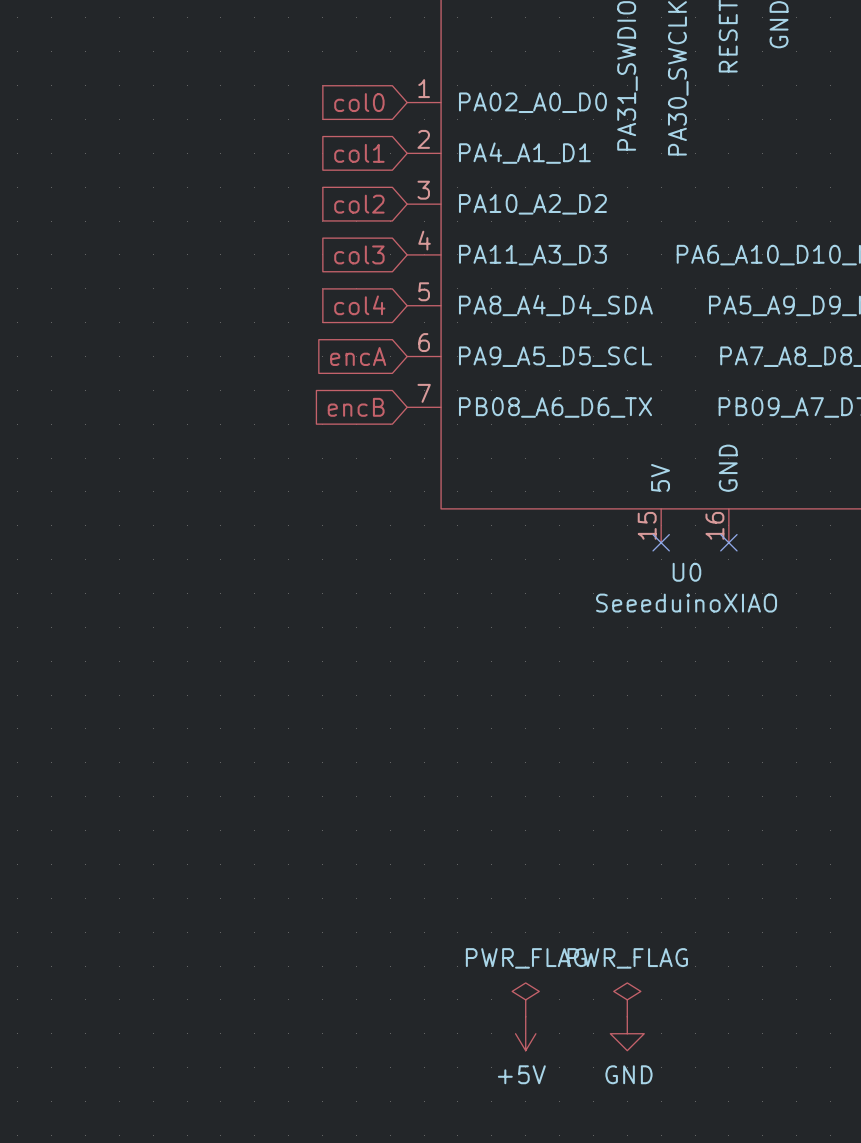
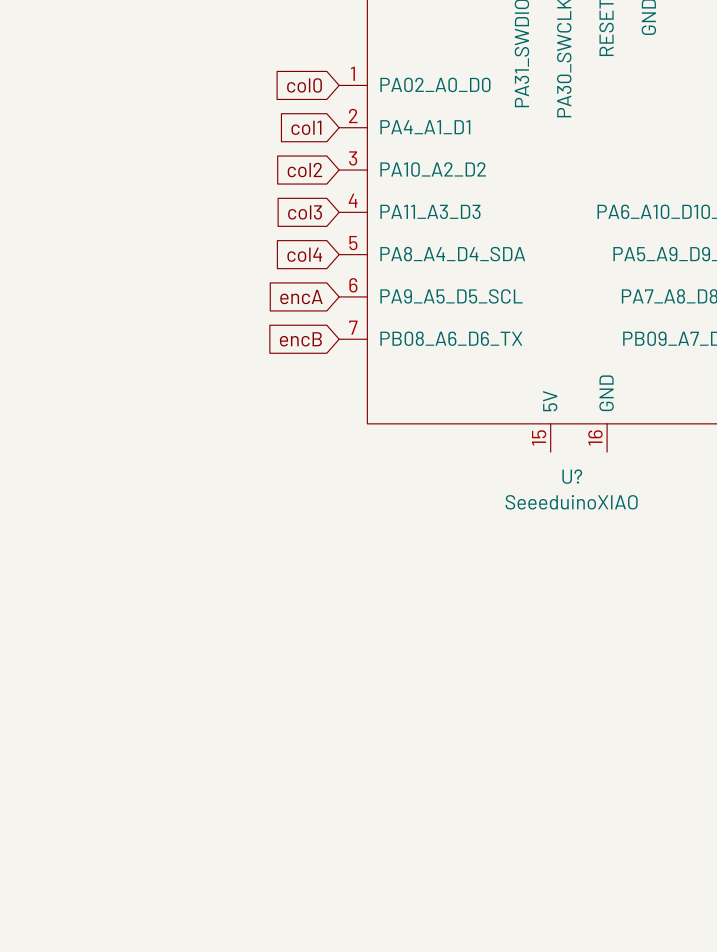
no-connect mark: (661, 542) -> none
no-connect mark: (728, 542) -> none
U0 name: U0 (686, 572) -> U? (572, 476)
power symbol: PWR_FLAG (525, 999) -> none
power symbol: PWR_FLAG (627, 999) -> none
power symbol: +5V (525, 1033) -> none
power symbol: GND (627, 1033) -> none

